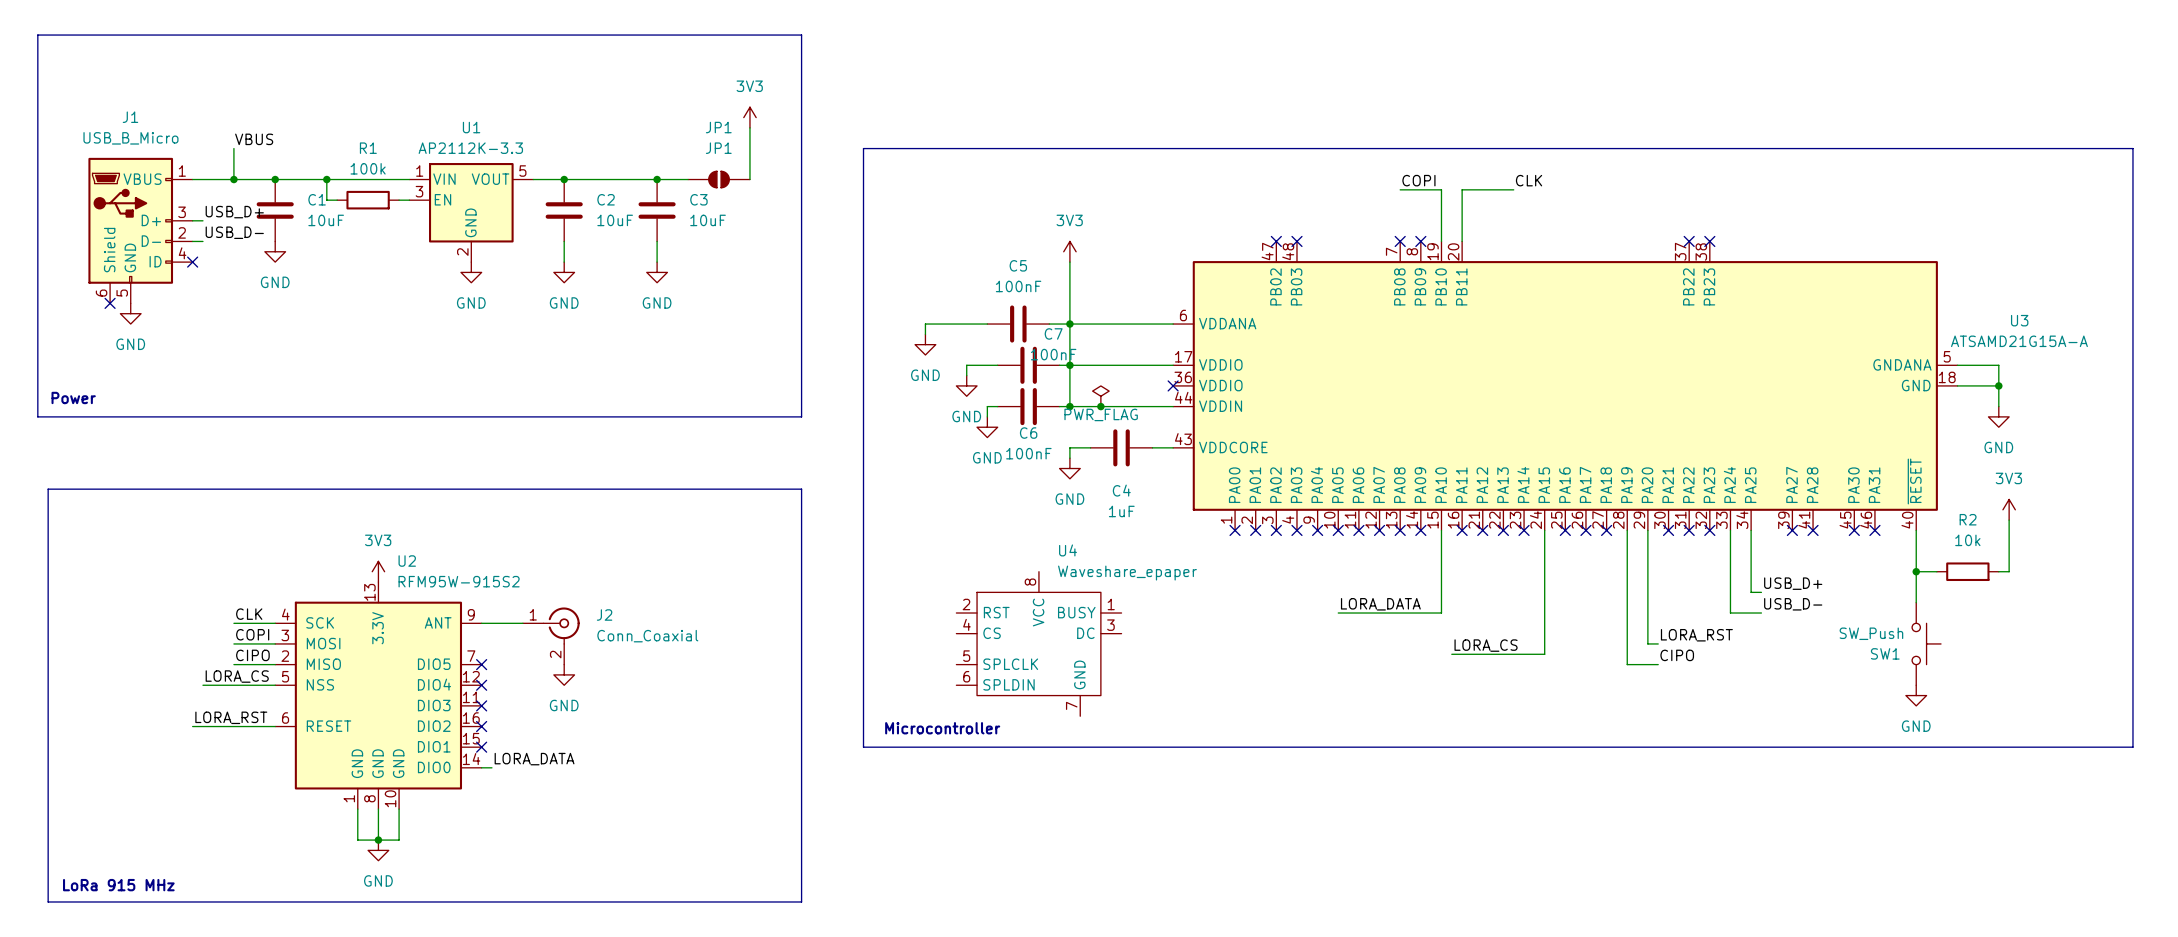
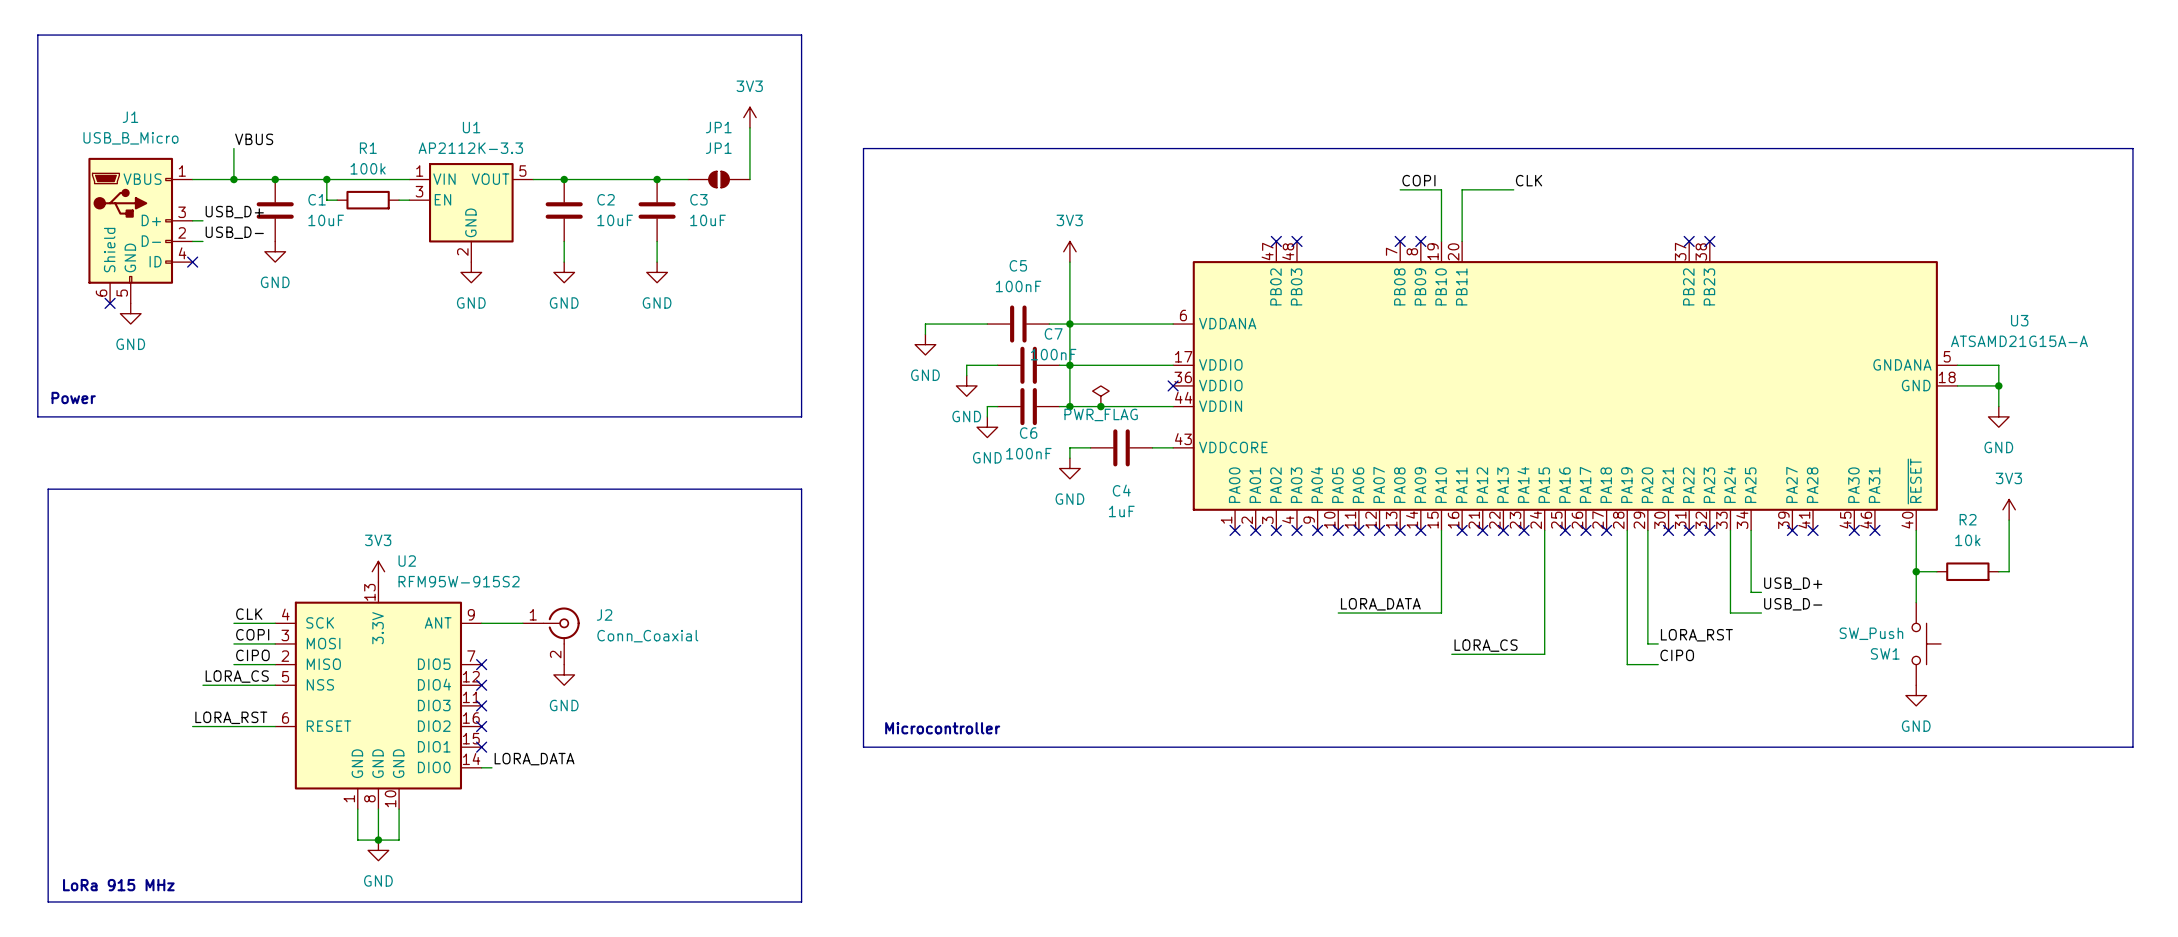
U4: Waveshare_epaper (1038, 643) -> none

